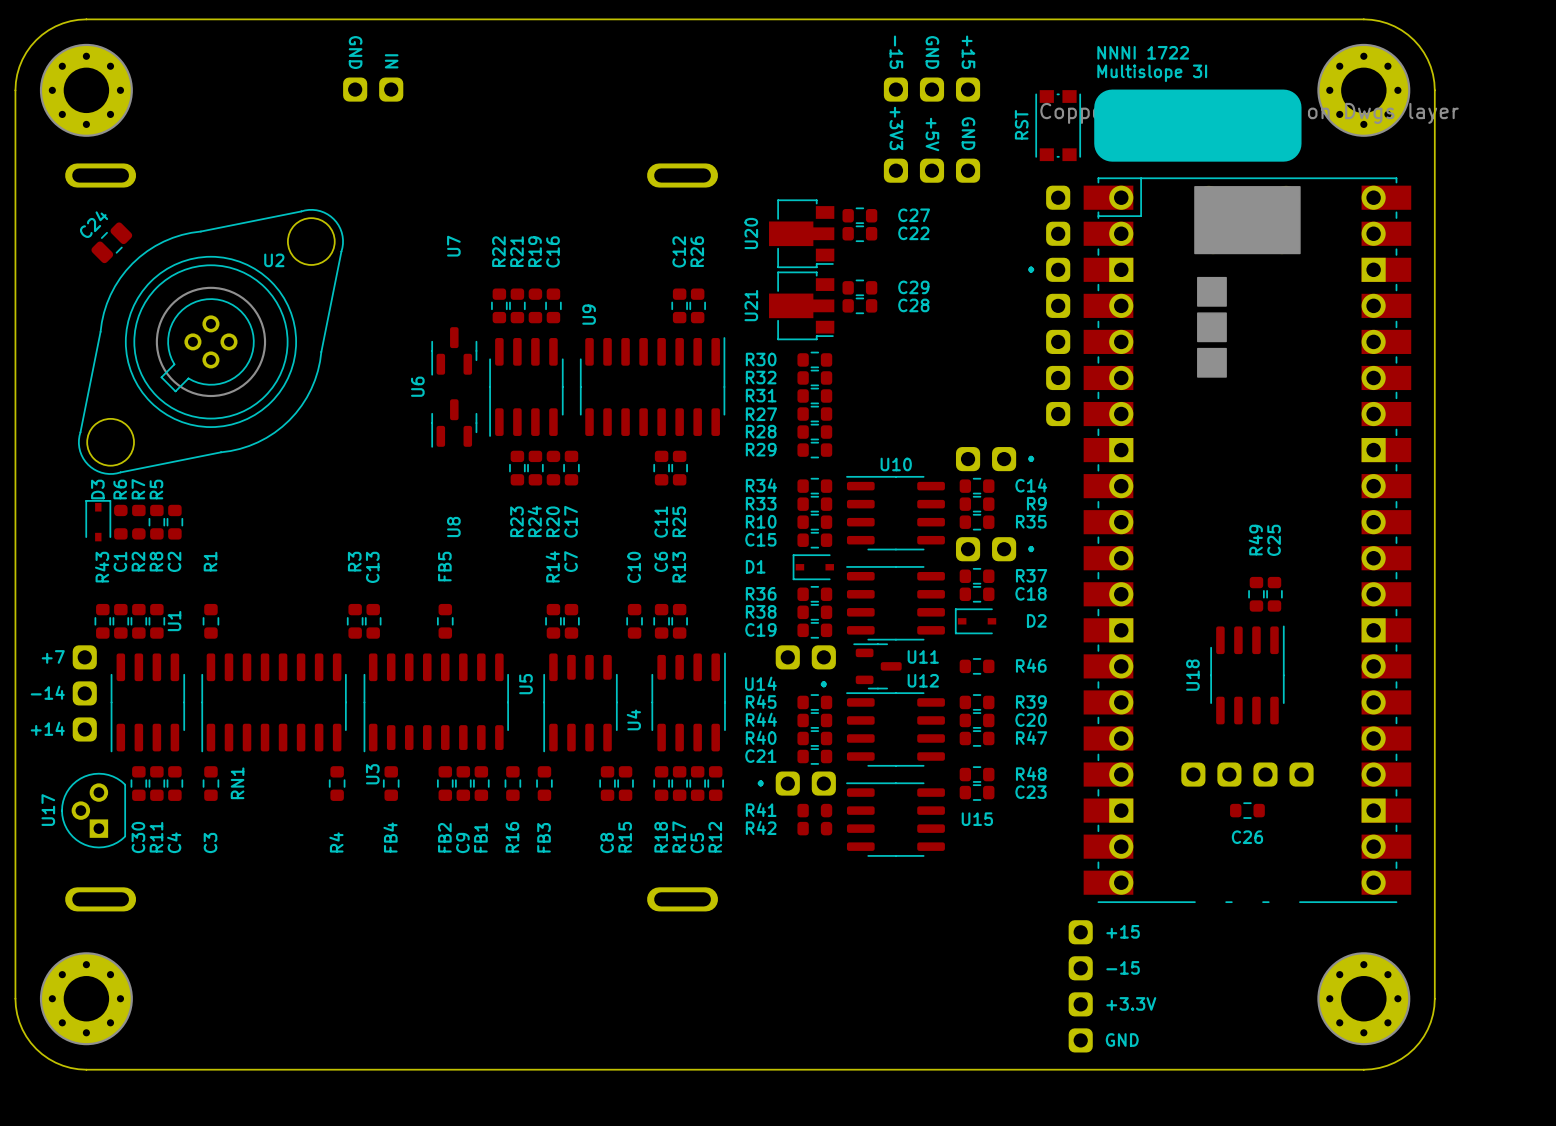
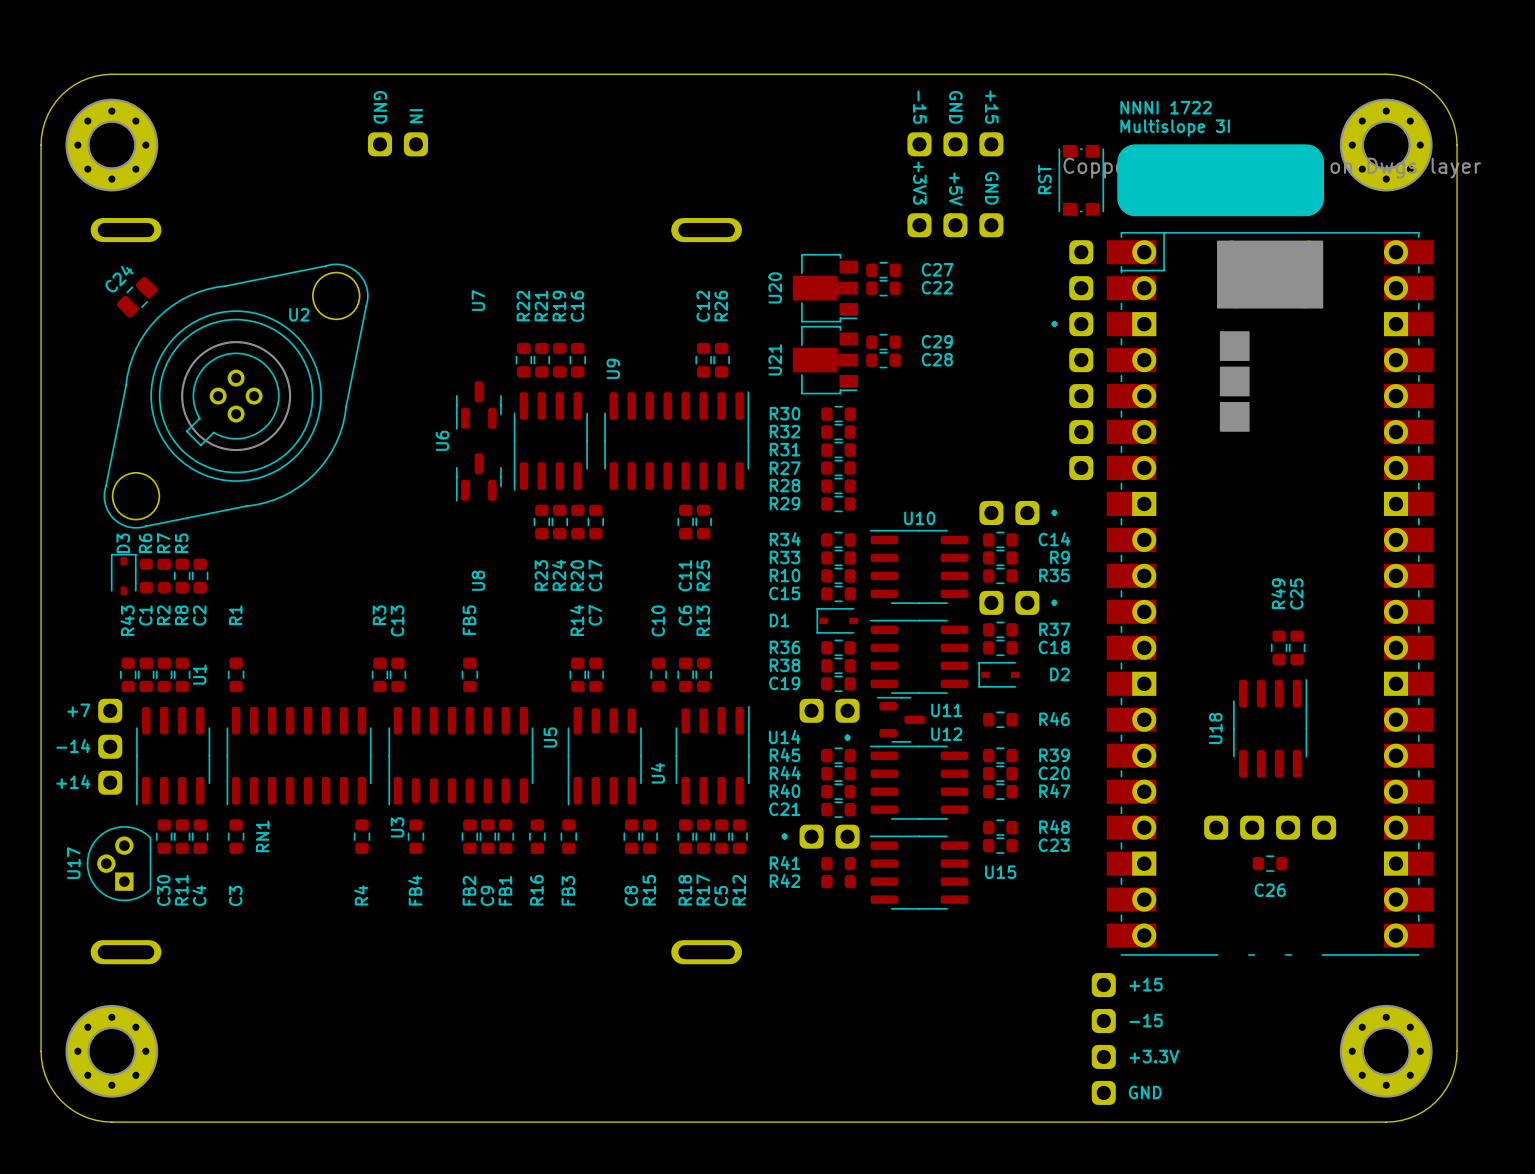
drawing: none -> [87, 120, 137, 170]
drawing: none -> [1361, 120, 1411, 170]
drawing: none -> [87, 1026, 137, 1076]
drawing: none -> [1361, 1026, 1411, 1076]

